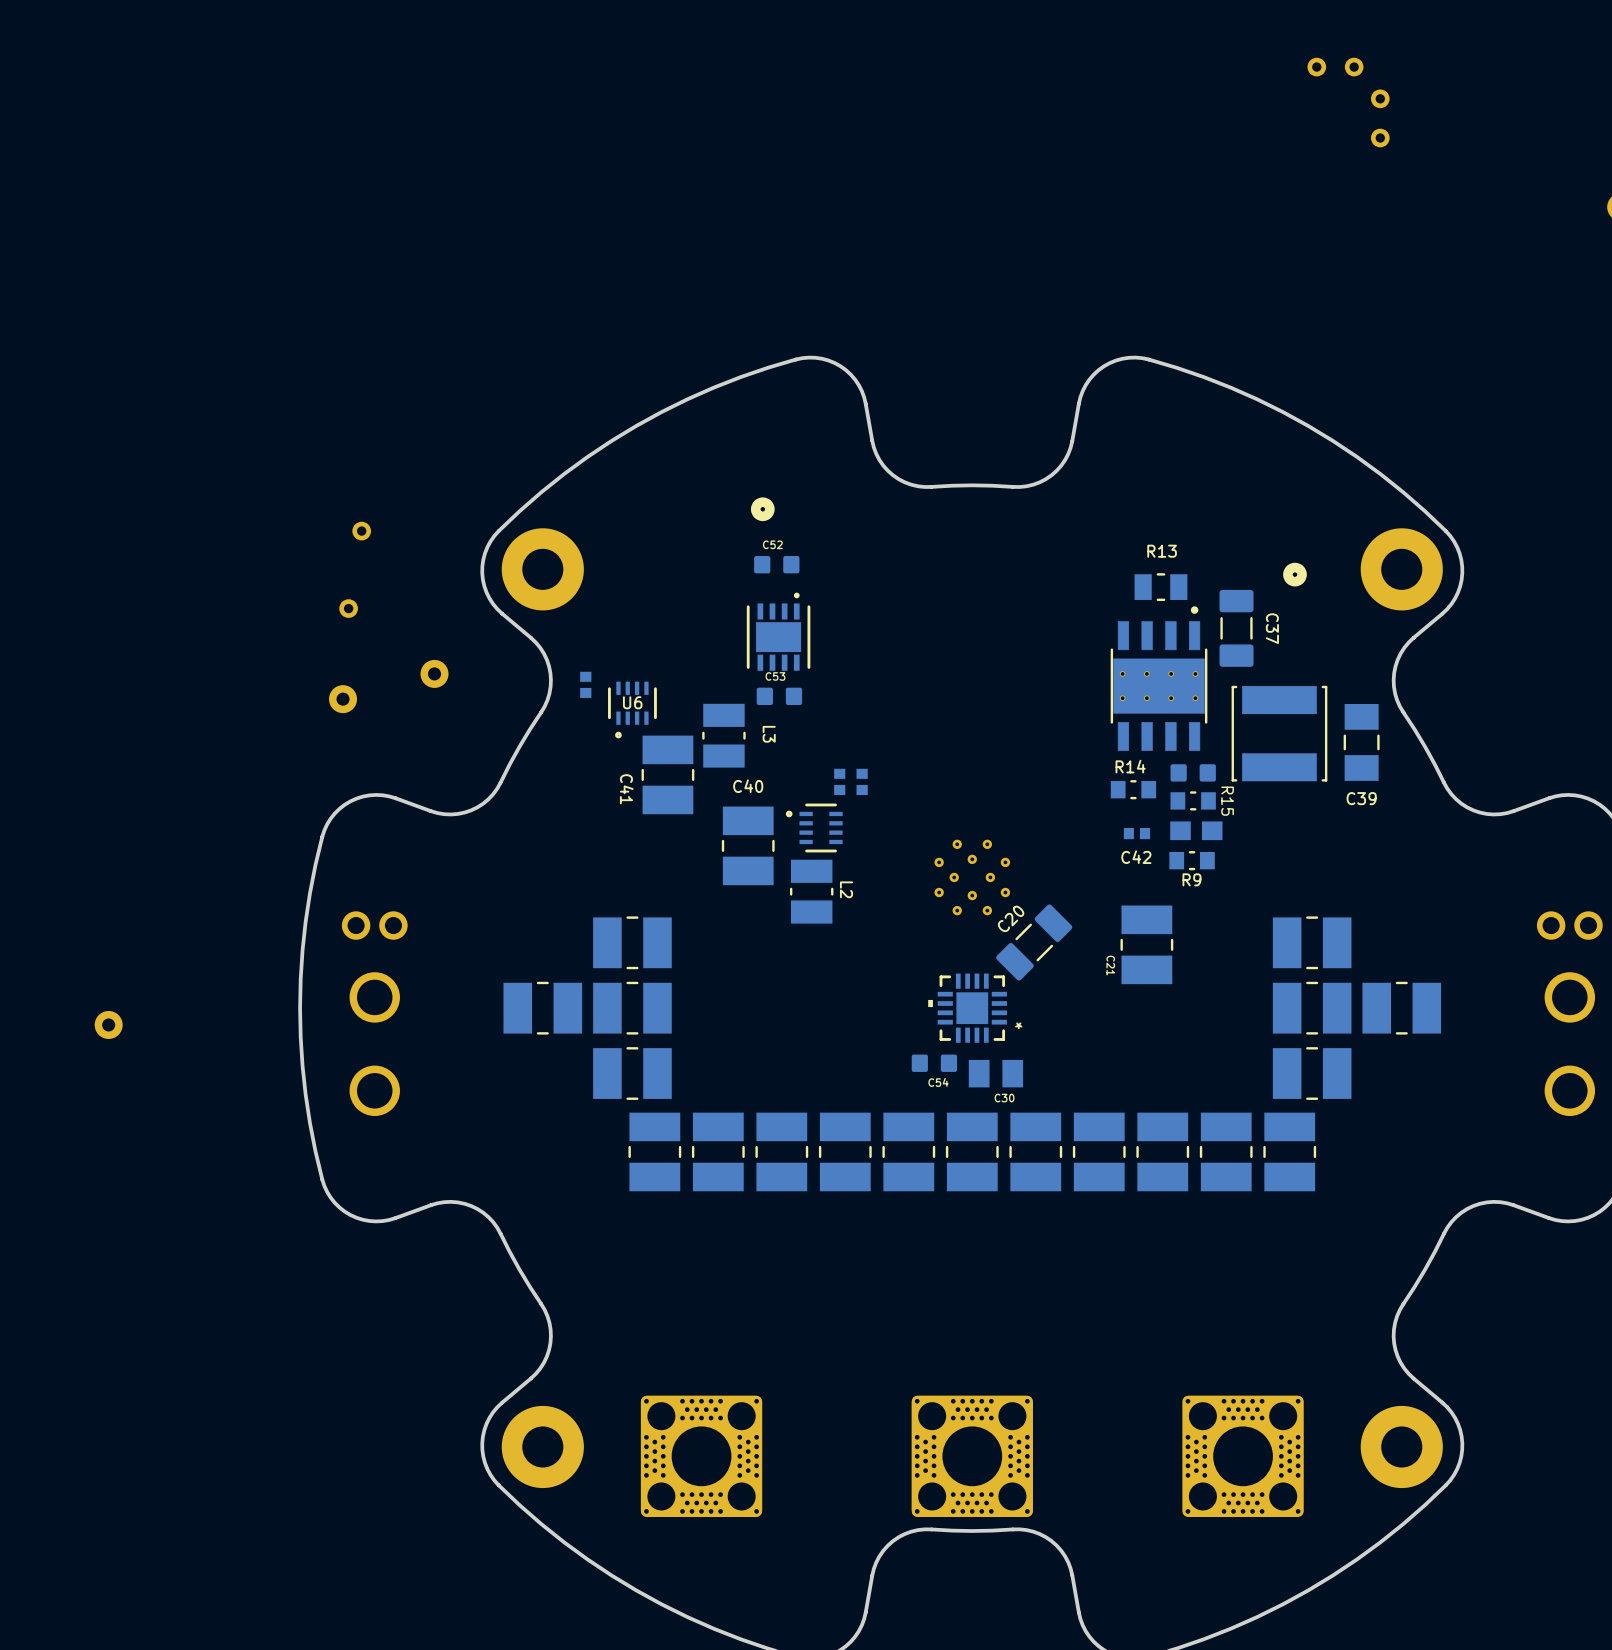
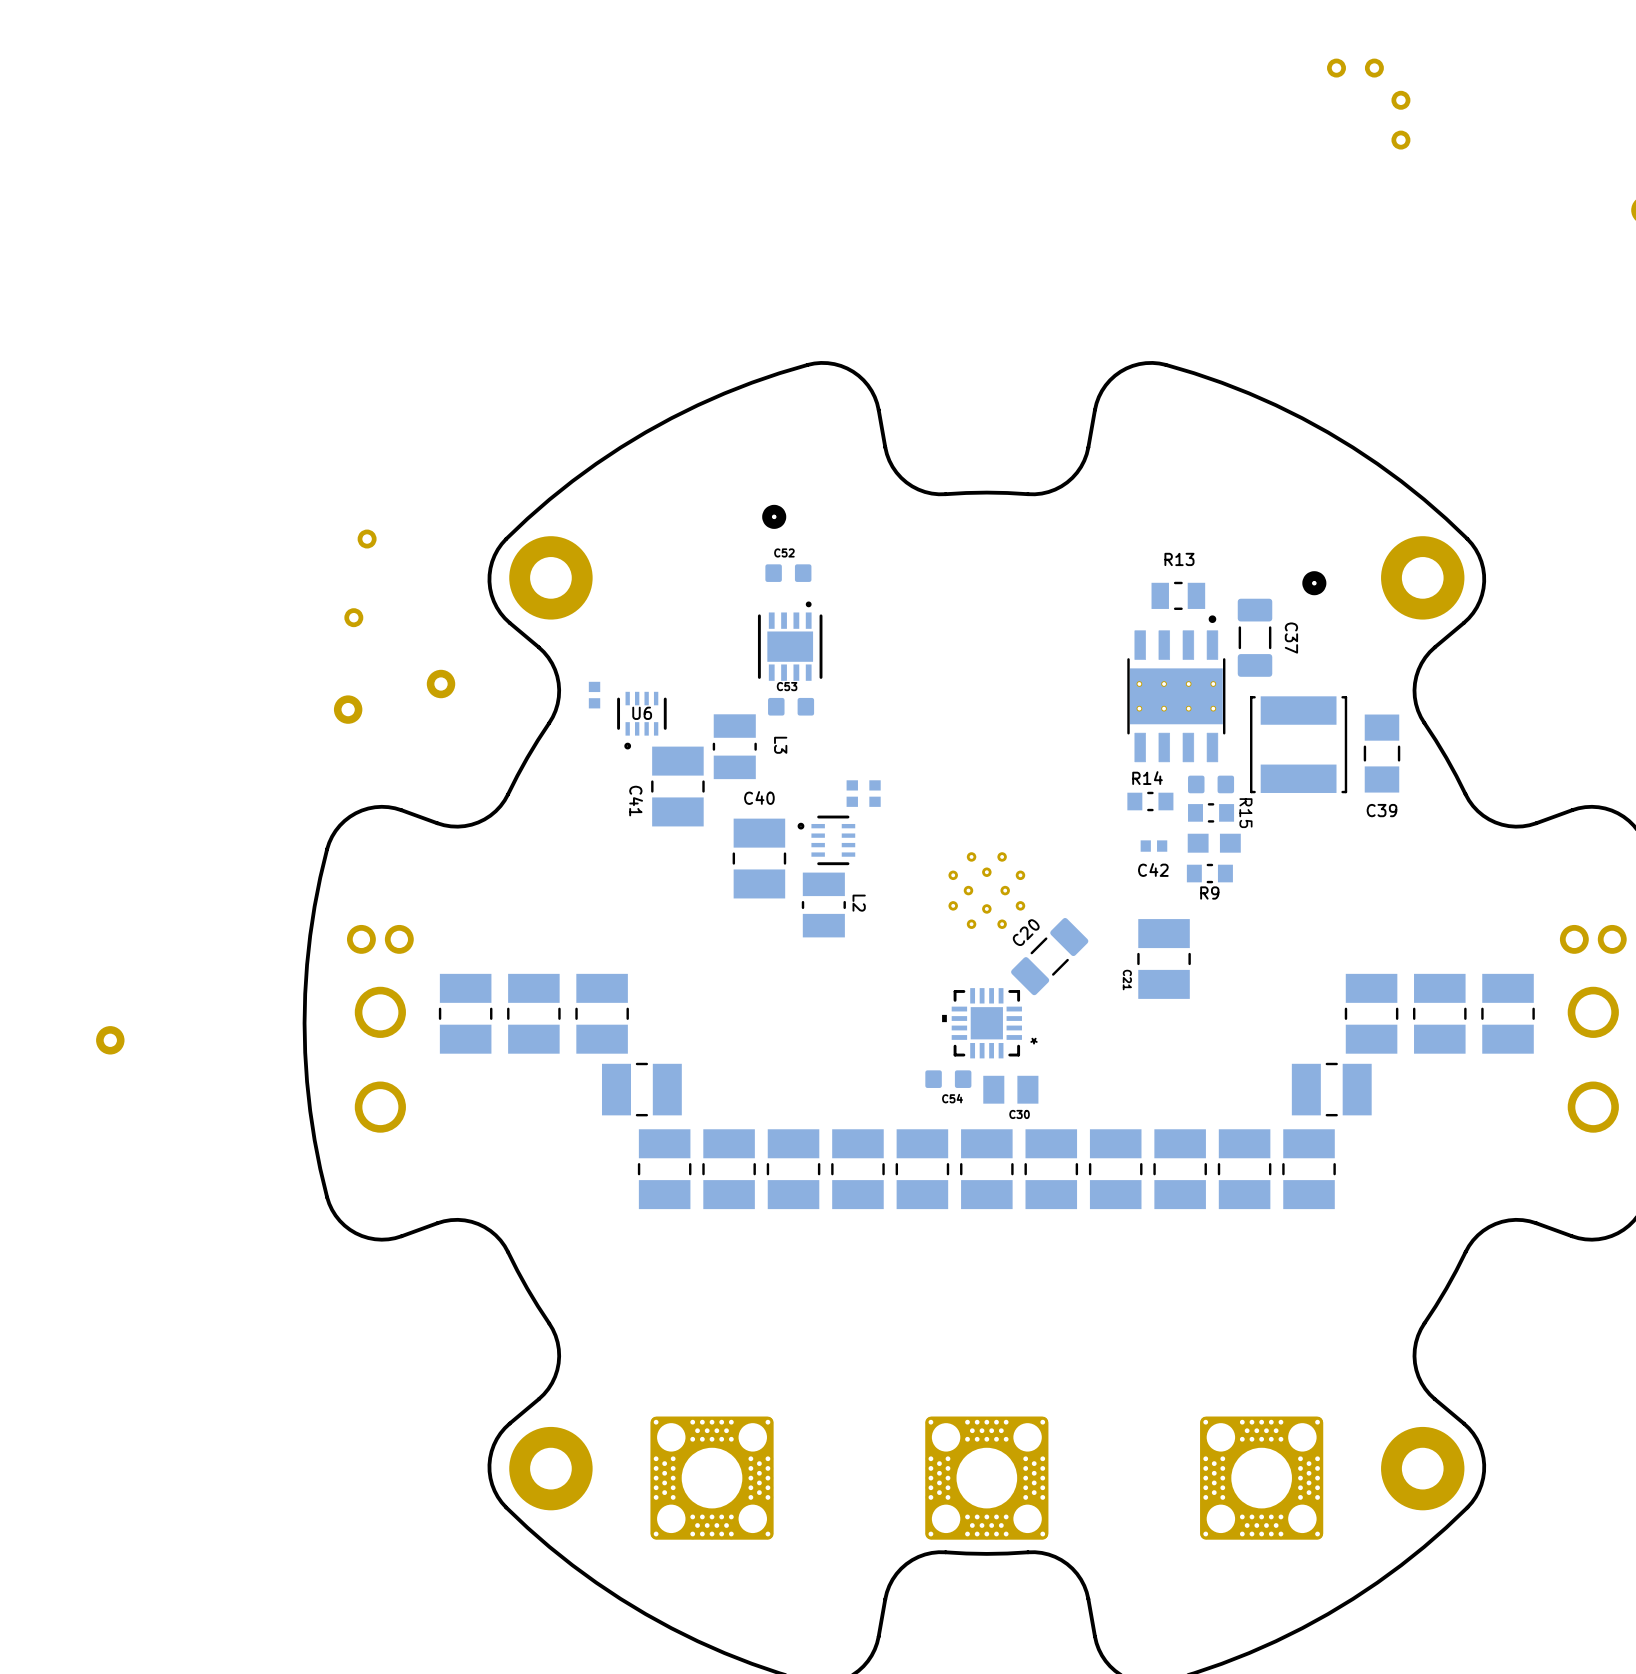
part: (632, 942) -> none
part: (1312, 942) -> none
part: none -> (465, 1013)
part: none -> (602, 1013)
part: none -> (1371, 1013)
part: none -> (1508, 1013)
part rotation: 0° (542, 1008) -> 90° clockwise (533, 1013)
part: (632, 1008) -> none
part: (1312, 1008) -> none
part rotation: 0° (1401, 1008) -> 90° clockwise (1439, 1013)

